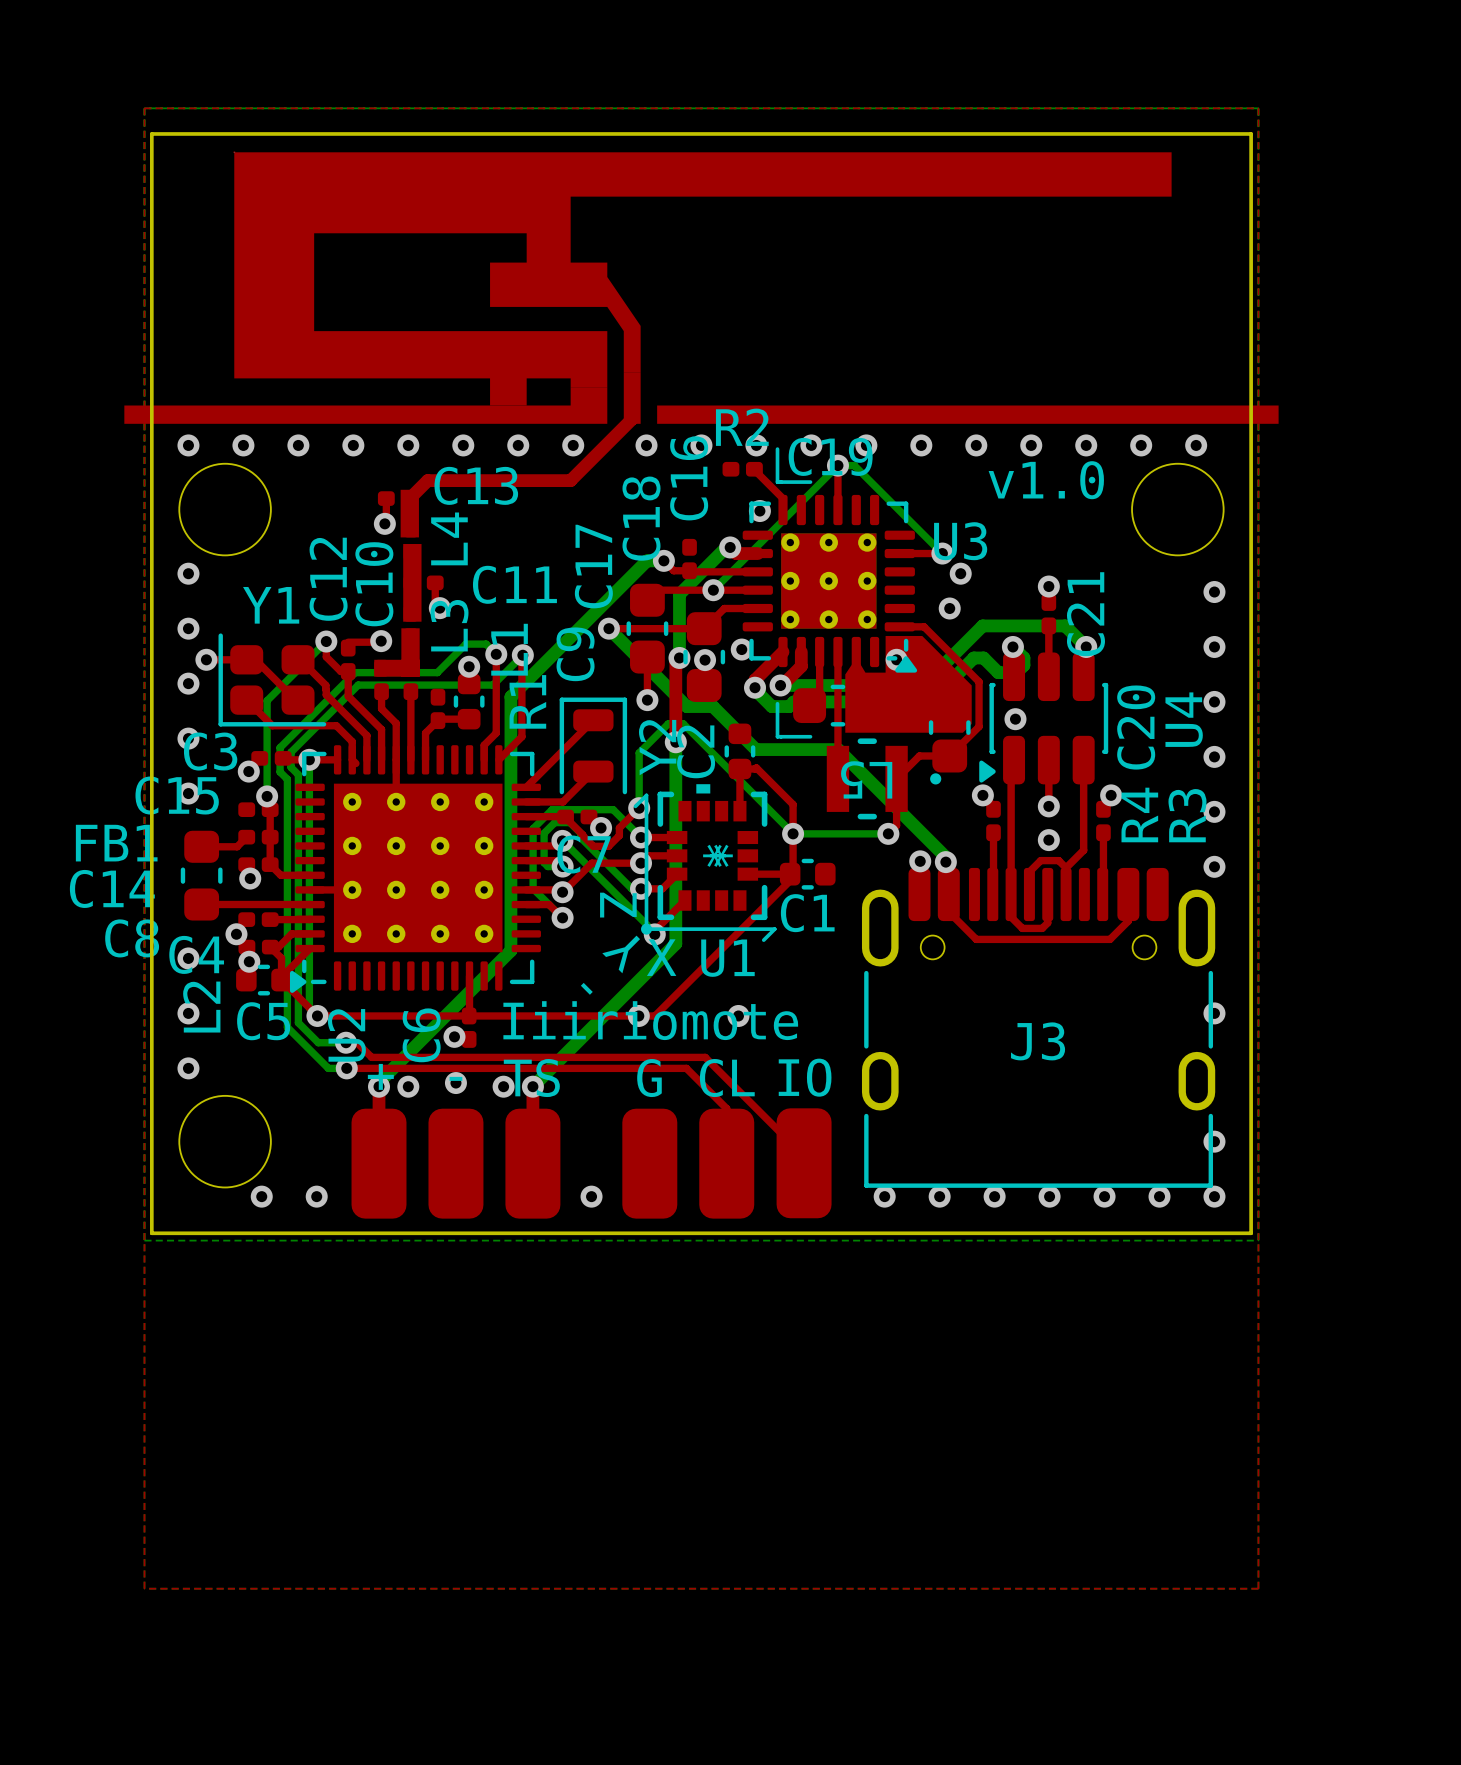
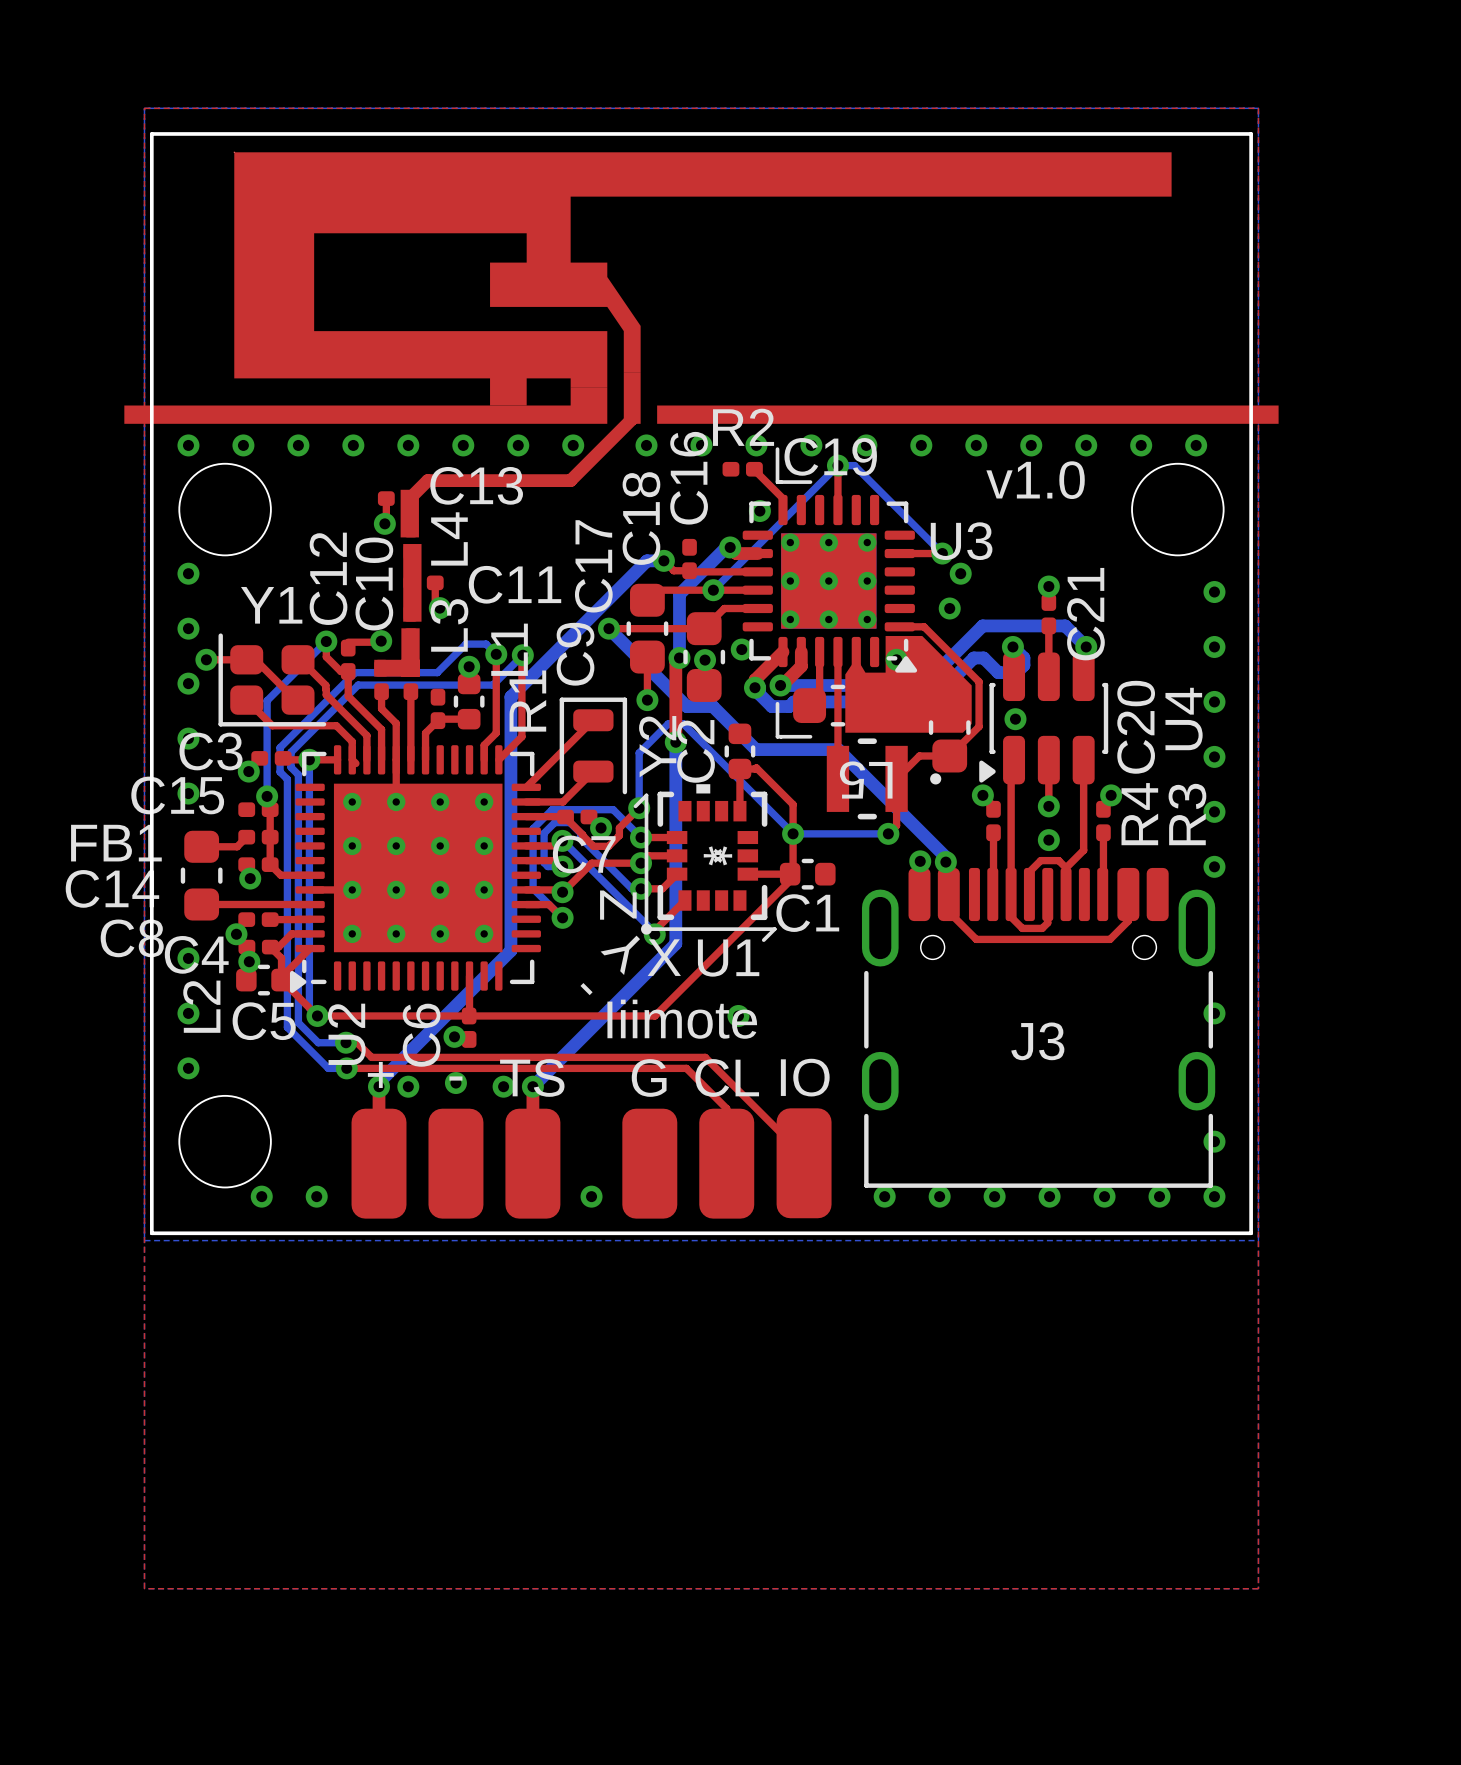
via: (638, 1015) -> none
text: Iiiriomote (650, 1020) -> Iiimote (682, 1019)

